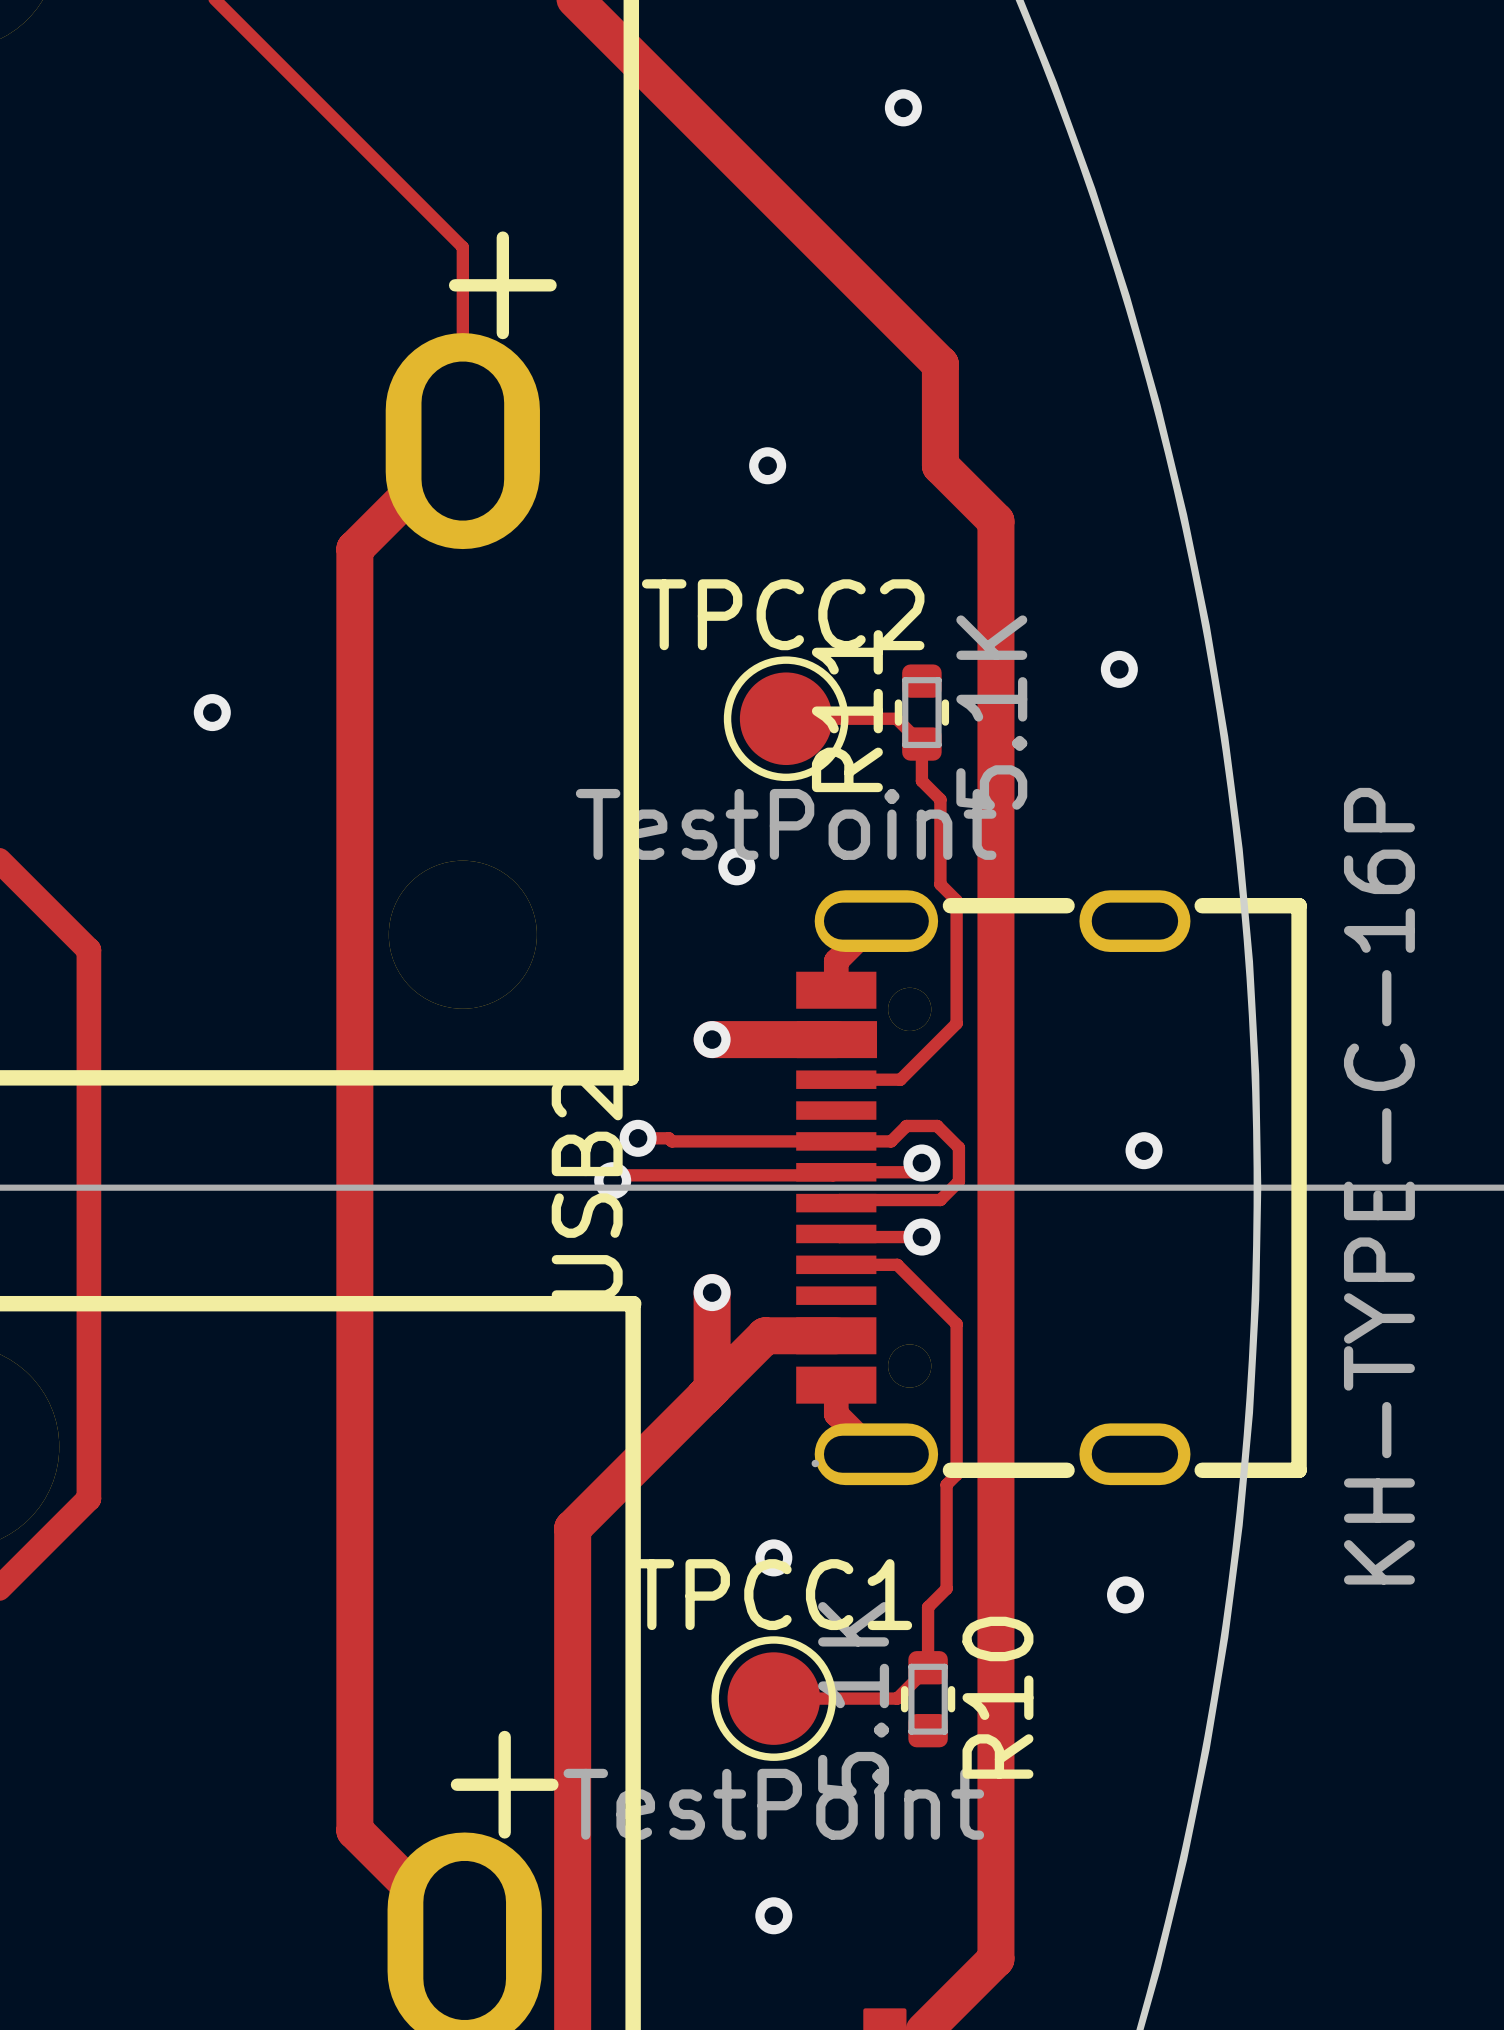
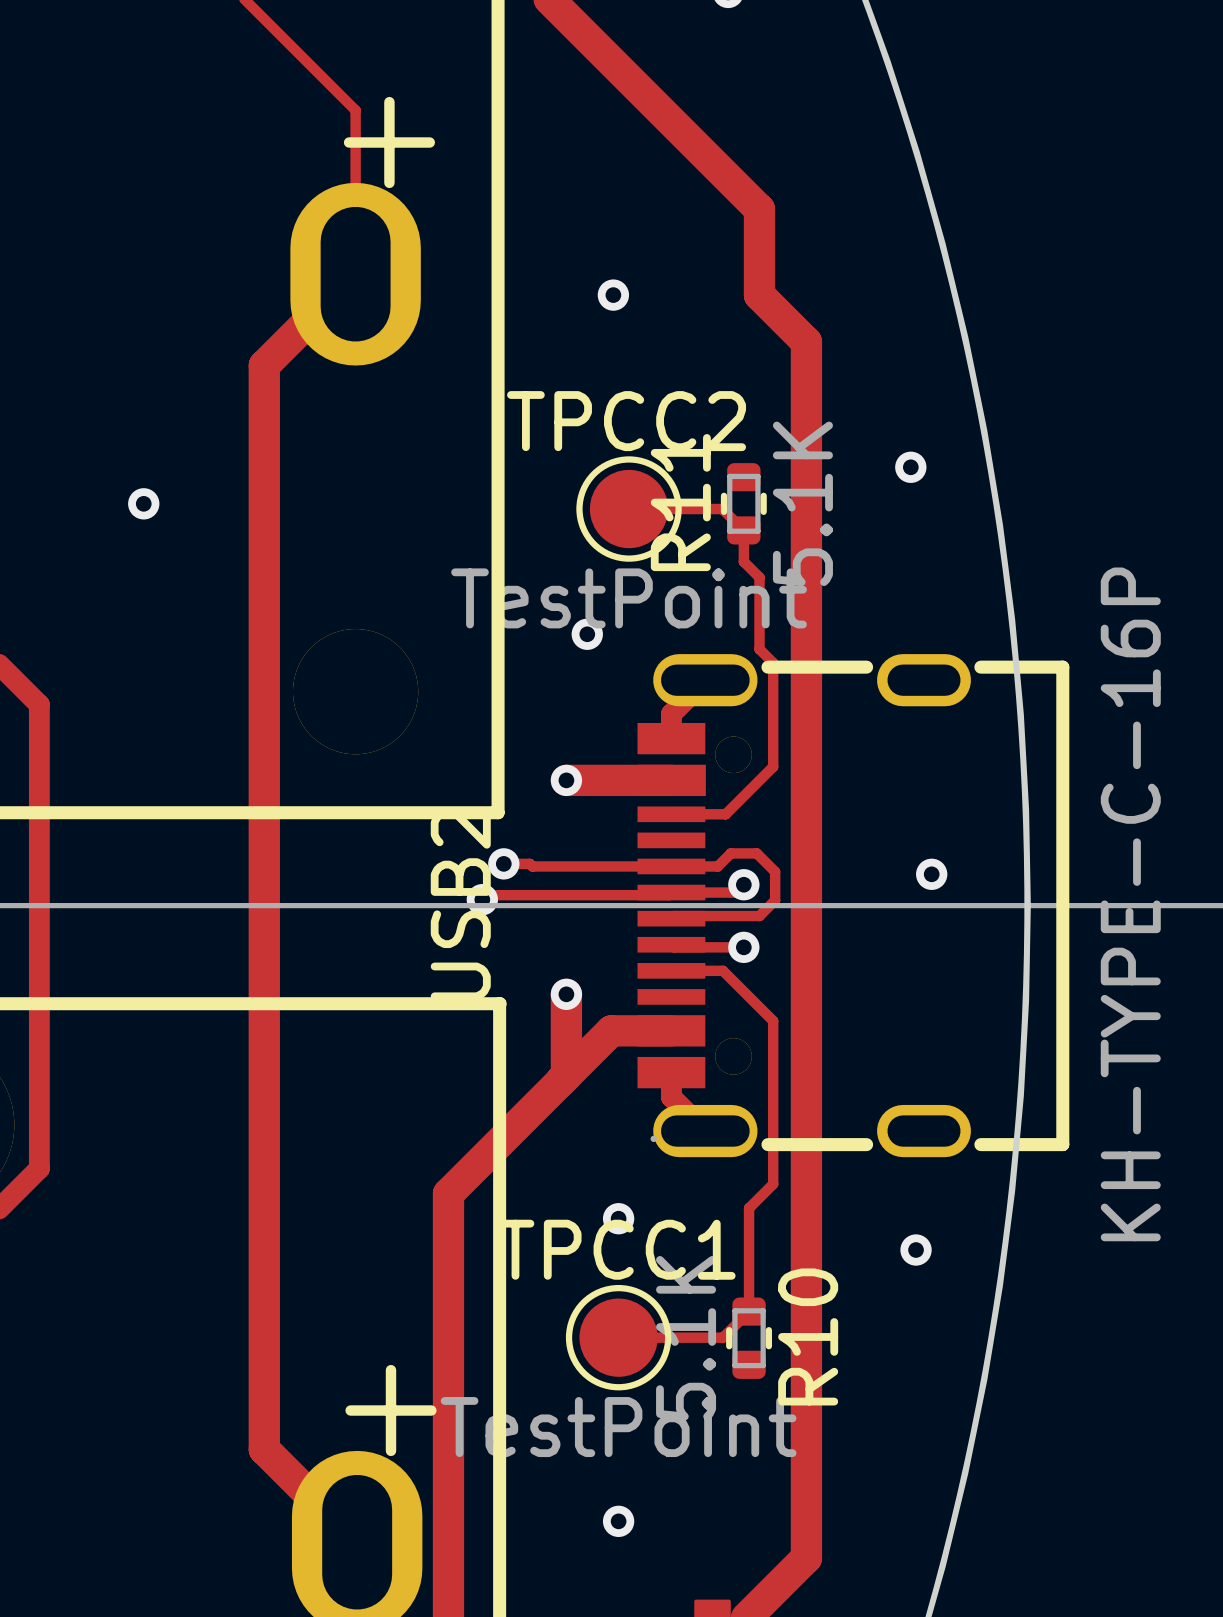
track: (956, 1474) (946, 1484) (946, 1588) (928, 1607) -> (773, 1148) (773, 1184) (749, 1208) (749, 1260)

